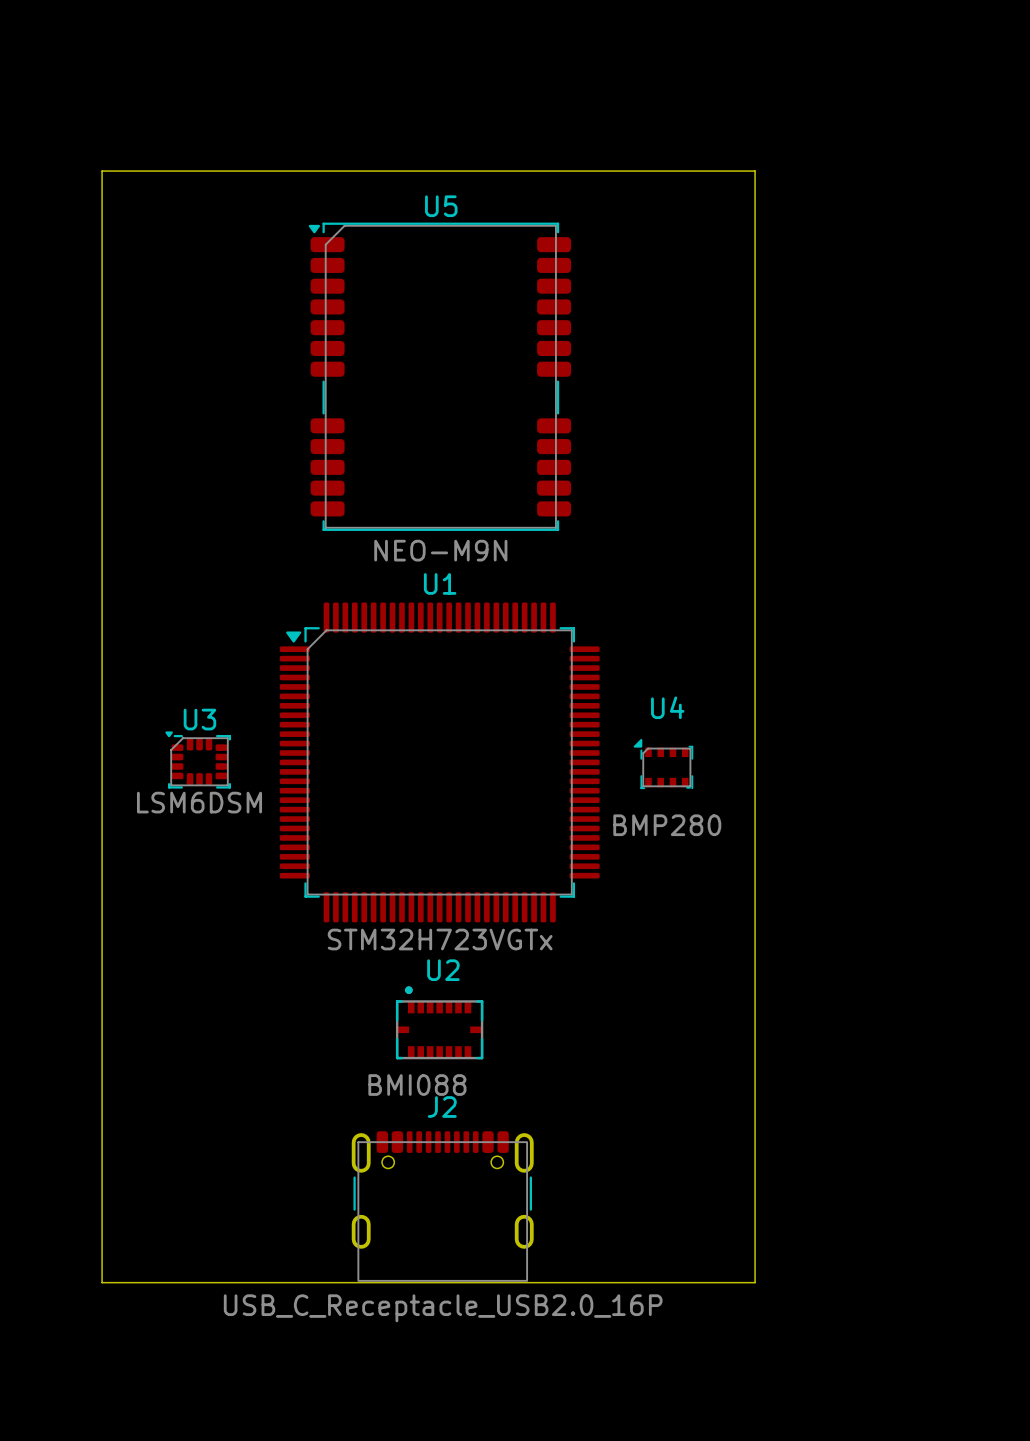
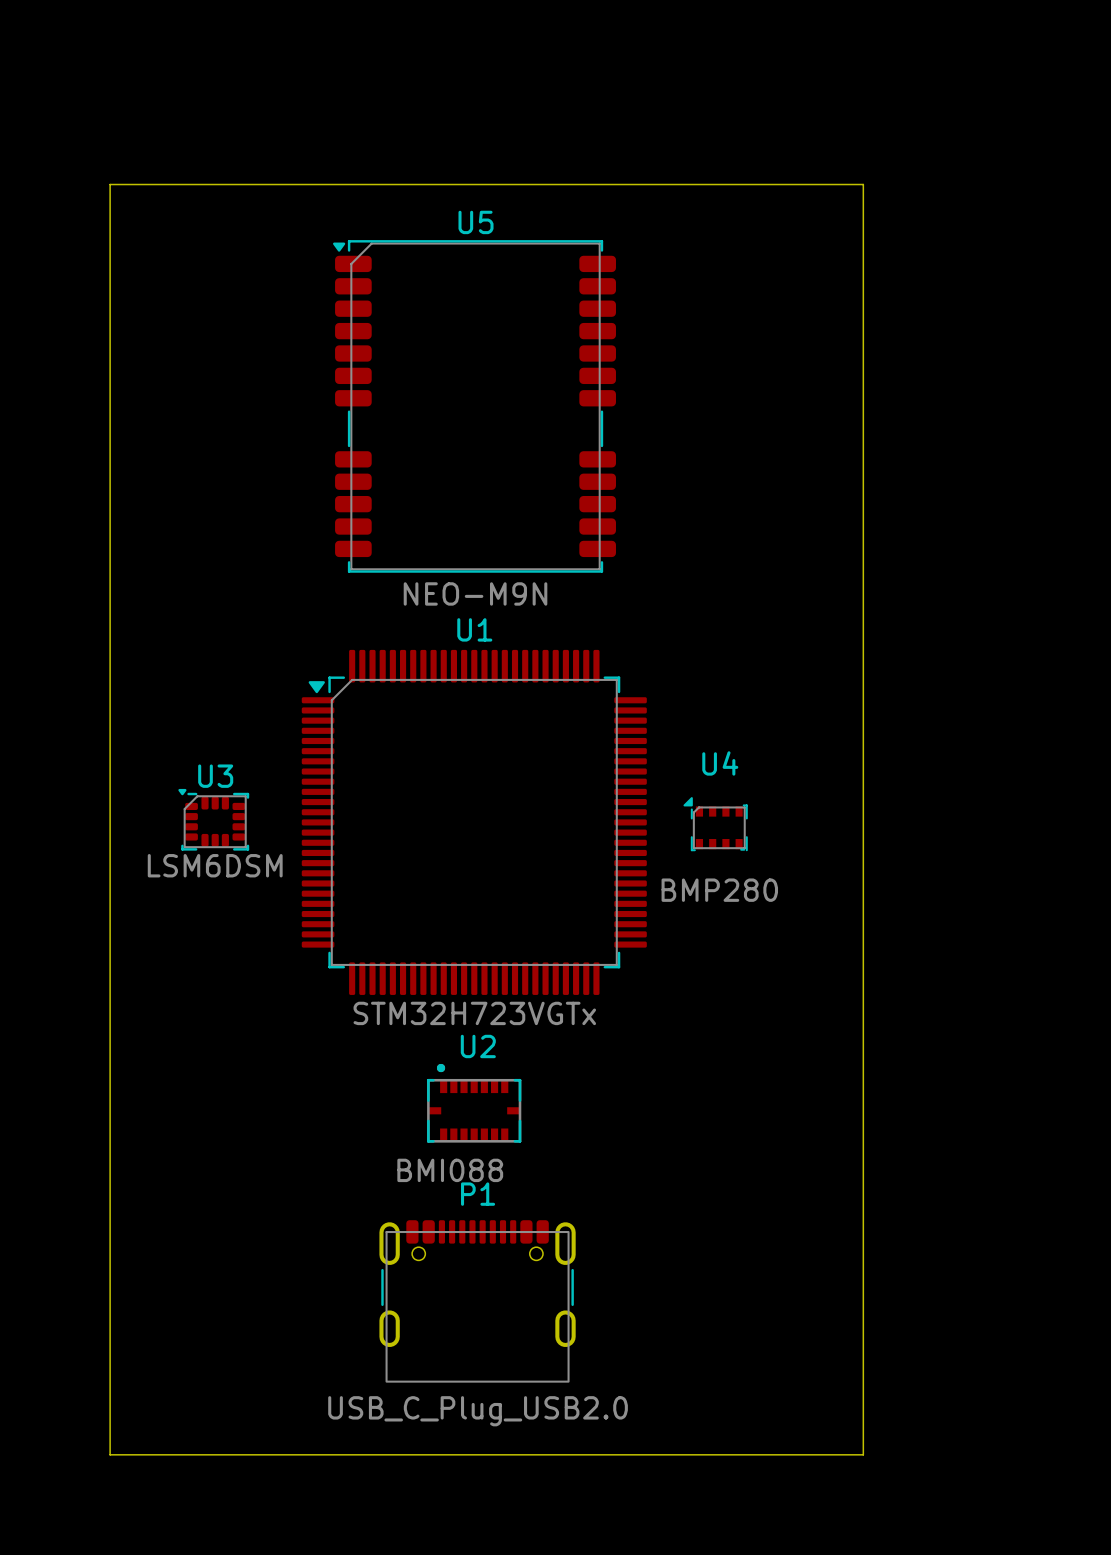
board edge: (755, 171) (755, 1282) (102, 1282) -> (814, 184) (863, 184) (863, 1454) (110, 1454) (110, 1383)
J2 name: J2 (442, 1107) -> P1 (478, 1194)
J2 value: USB_C_Receptacle_USB2.0_16P (443, 1308) -> USB_C_Plug_USB2.0 (478, 1411)

